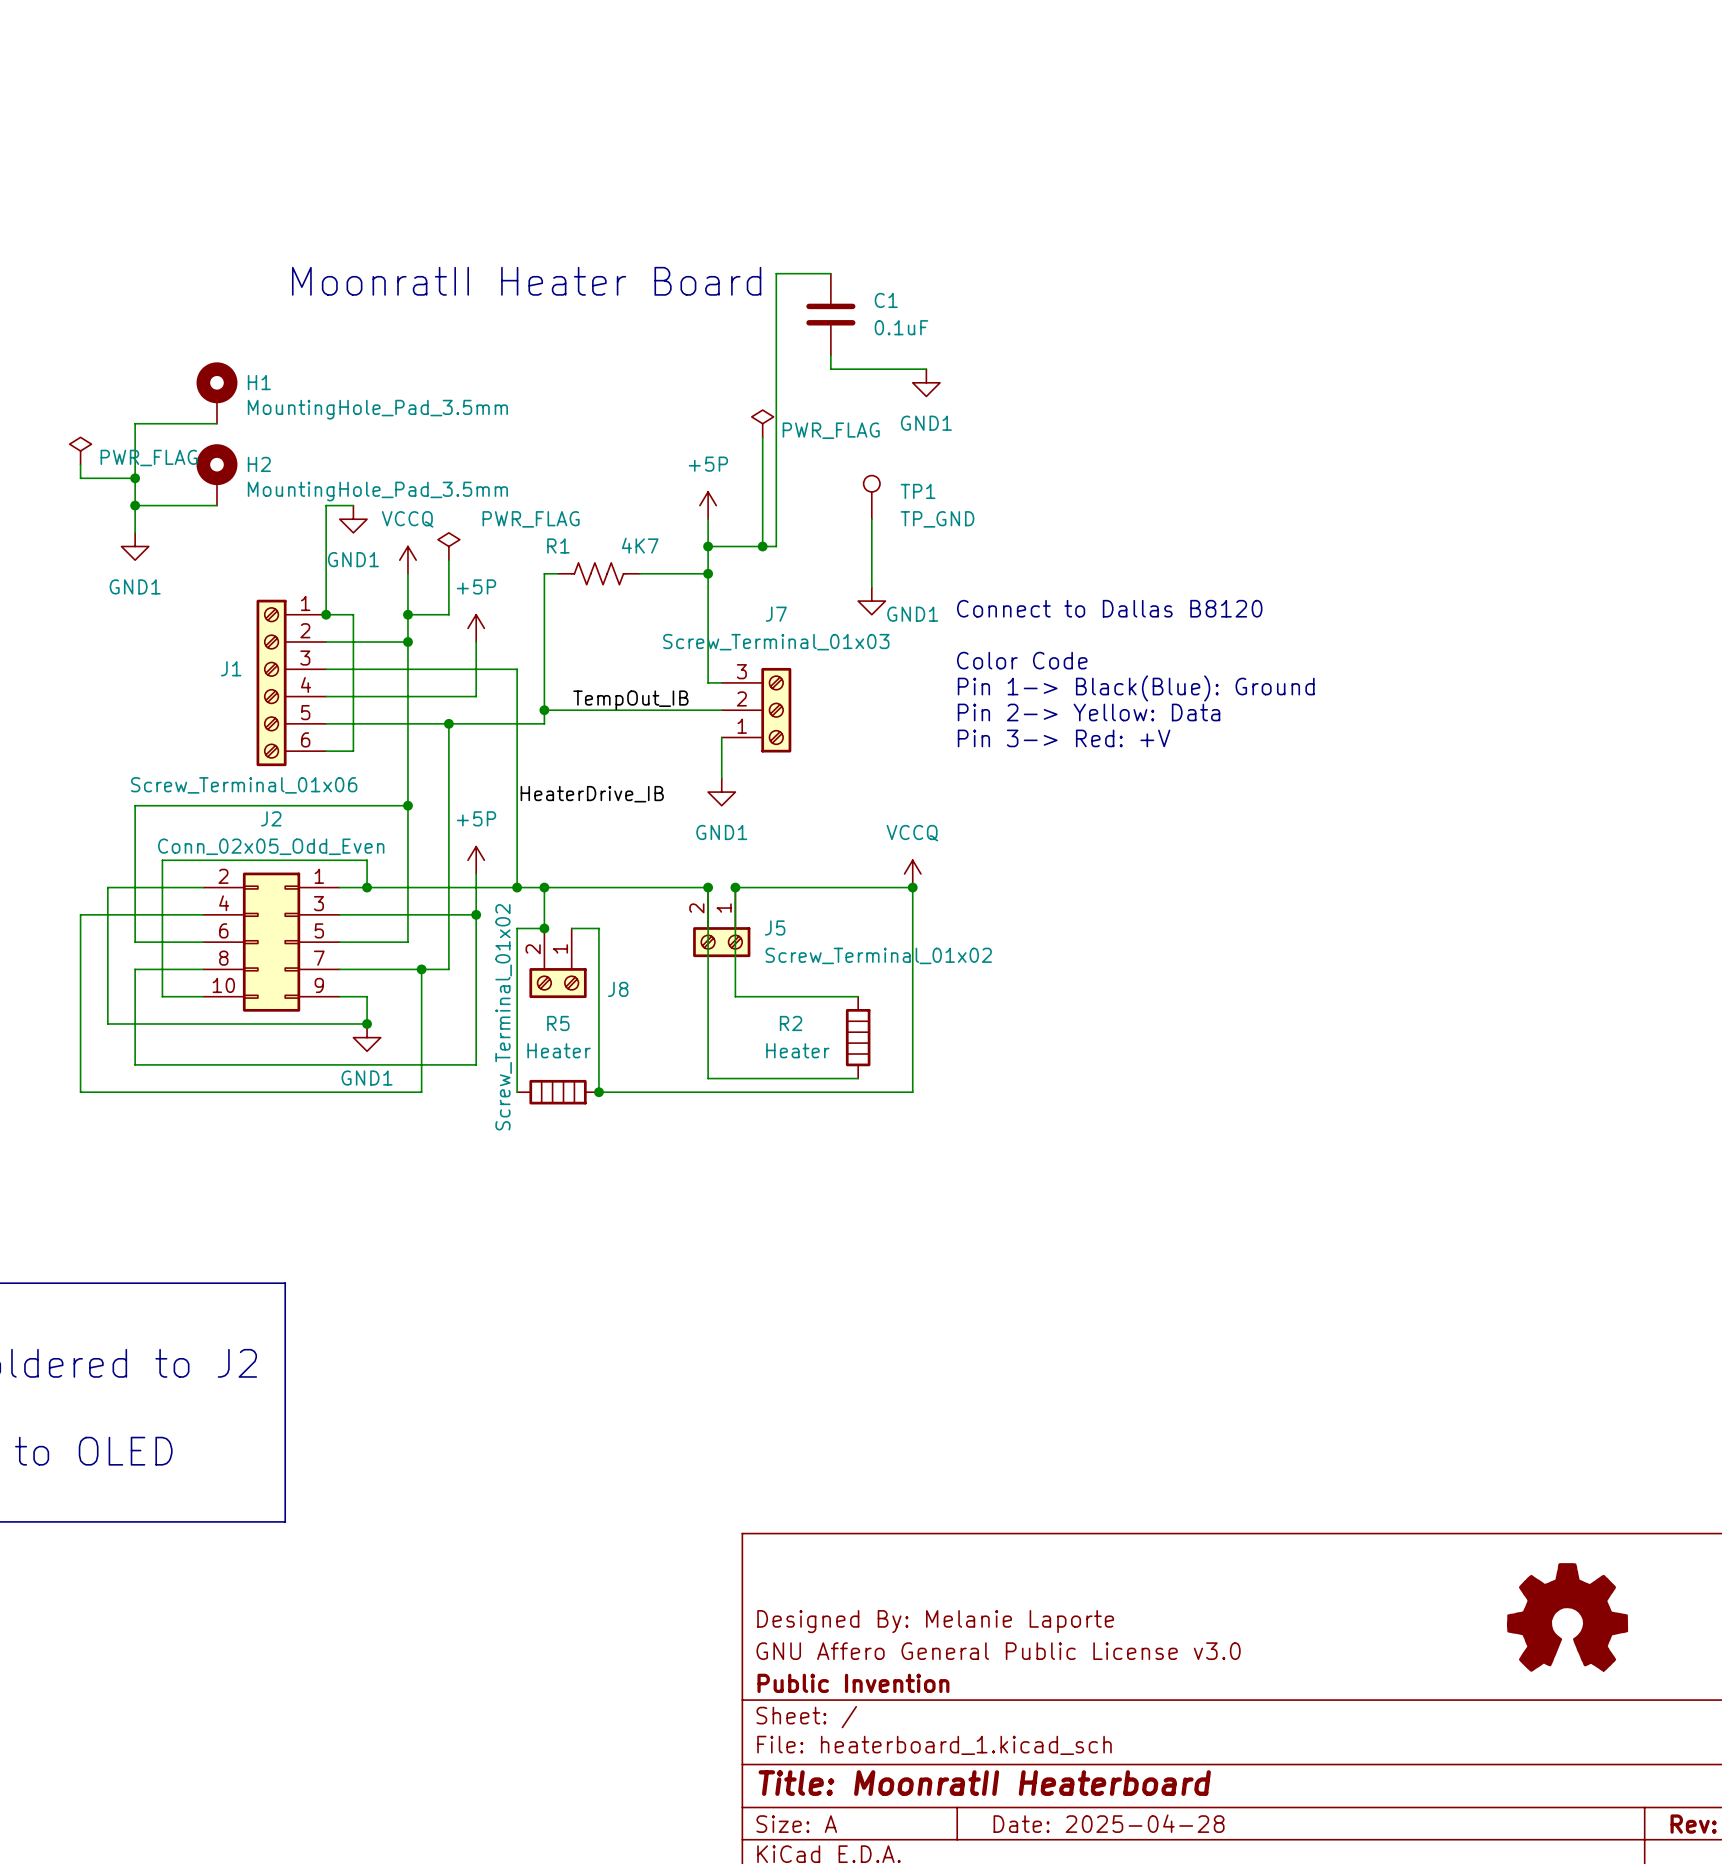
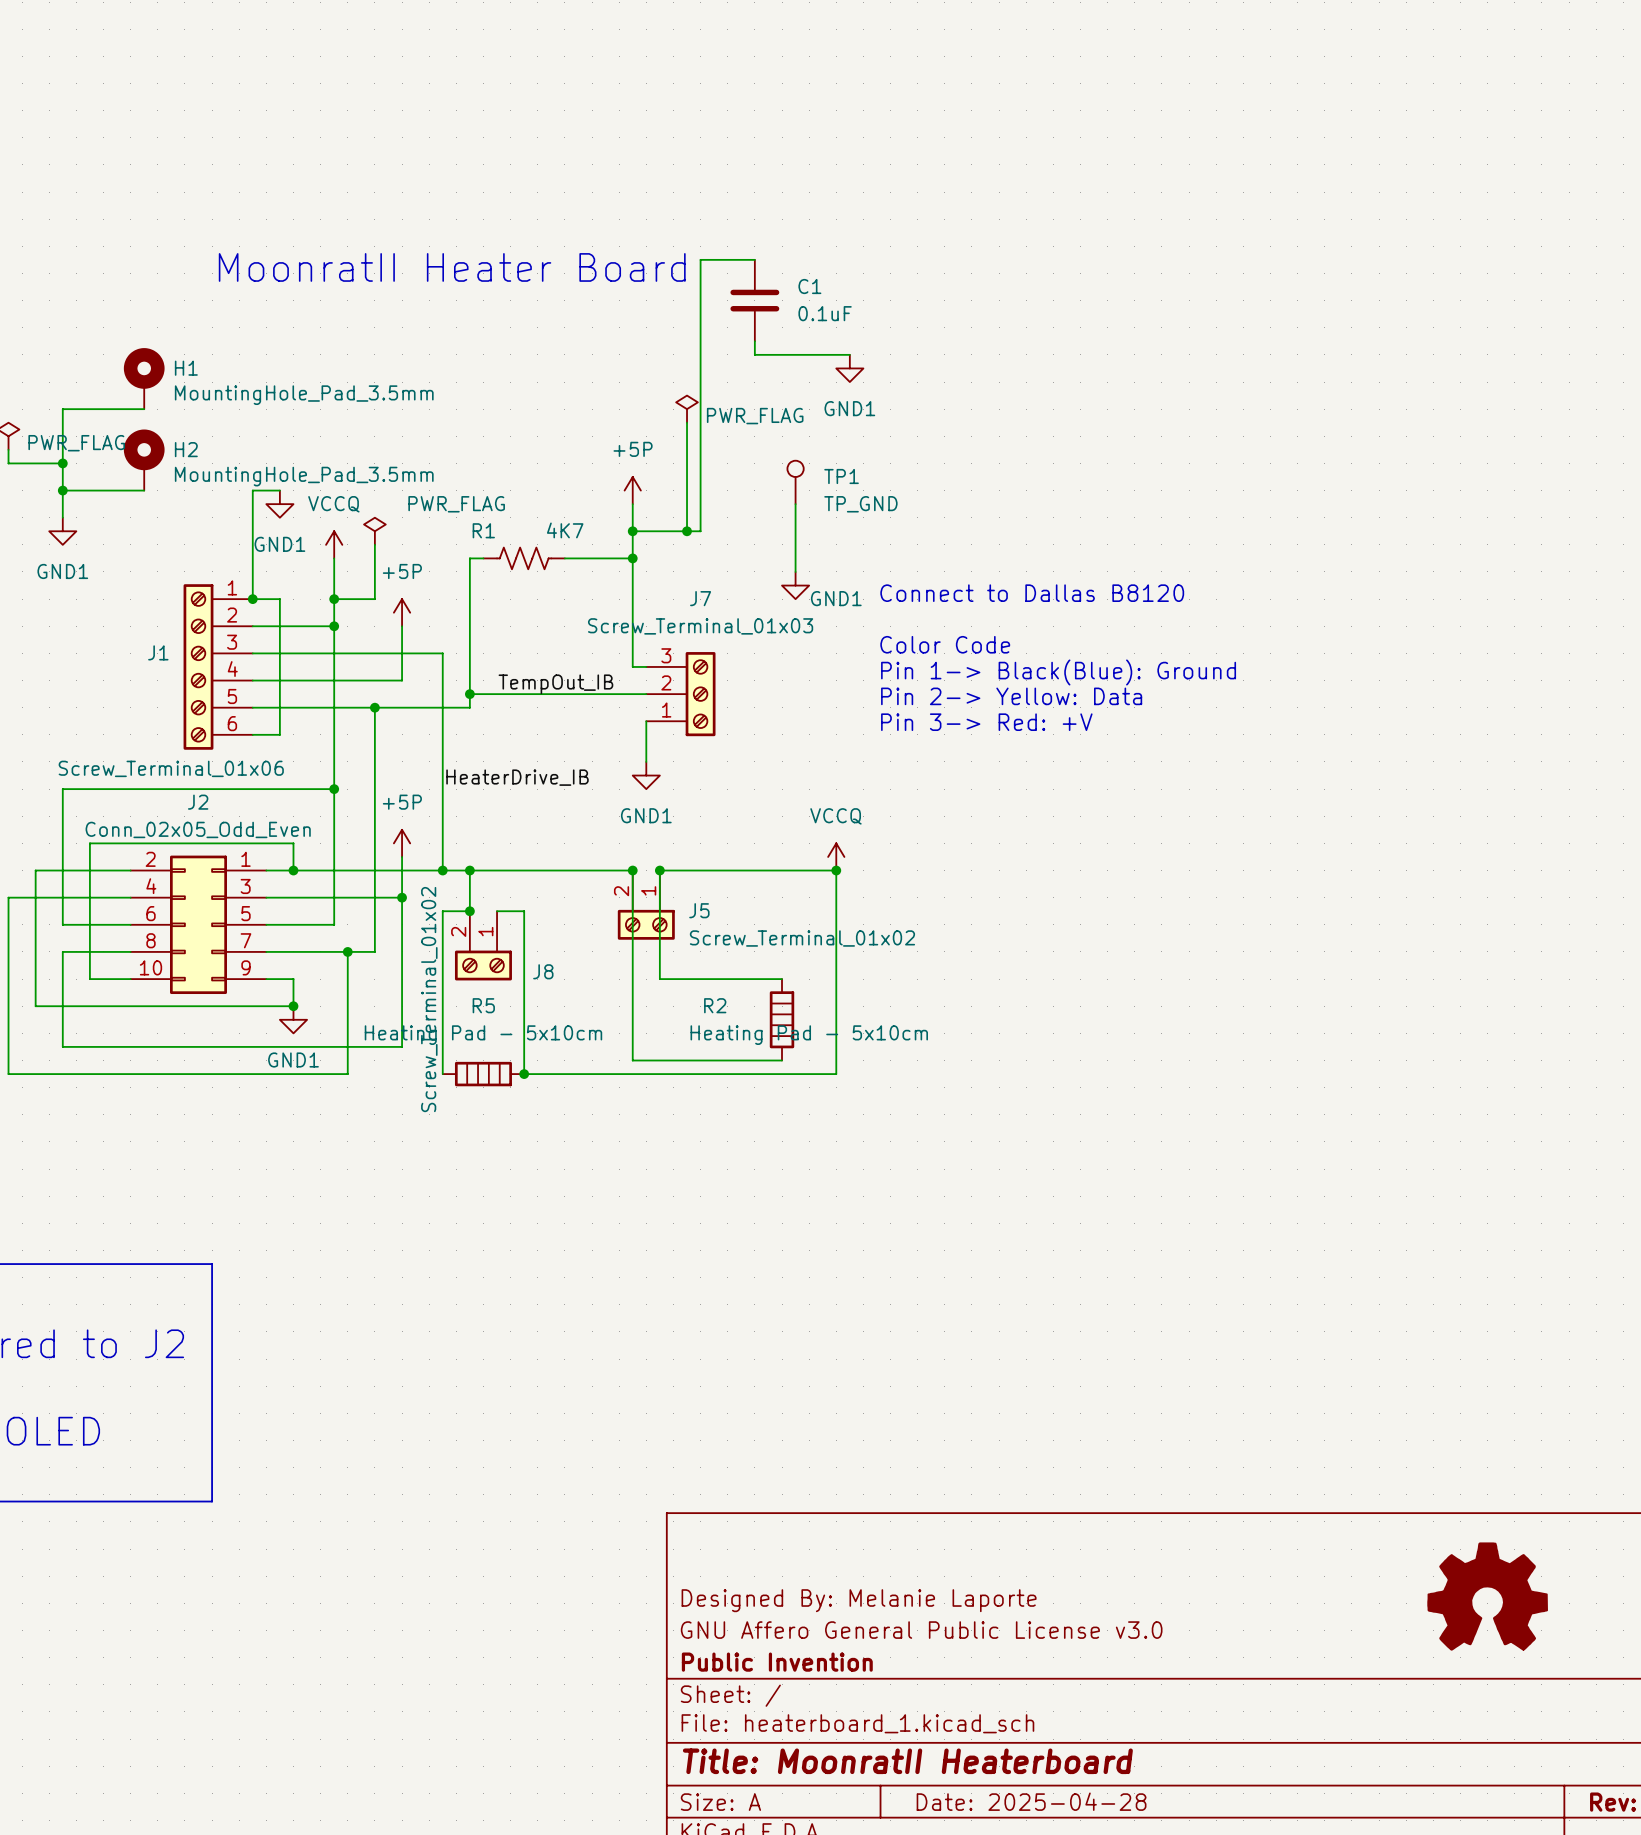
R5 value: Heater (559, 1050) -> Heating Pad - 5x10cm (483, 1035)
R2 value: Heater (797, 1050) -> Heating Pad - 5x10cm (809, 1035)

